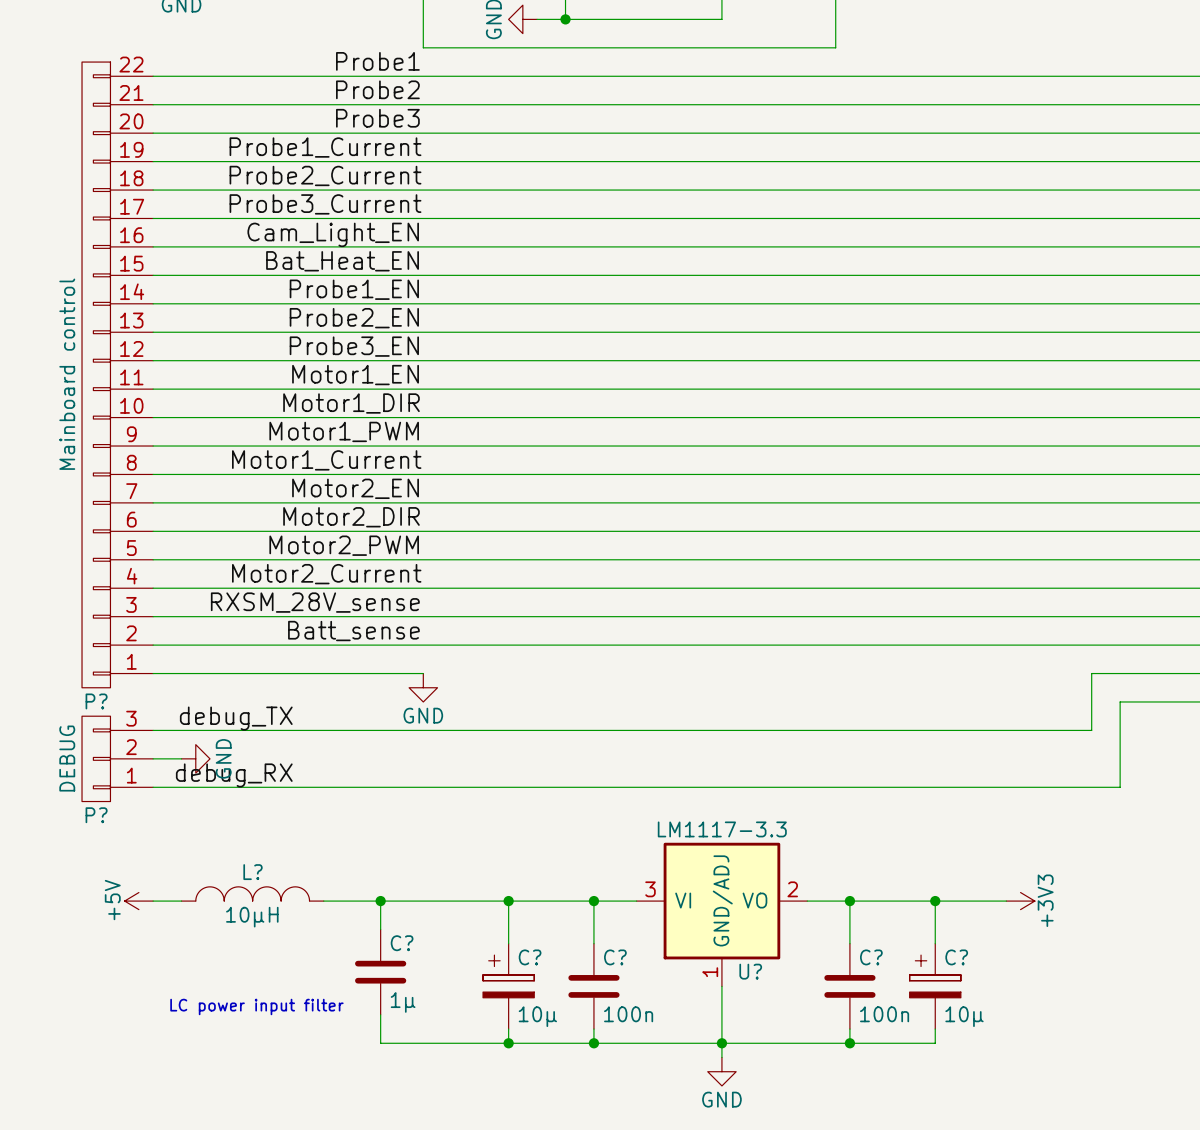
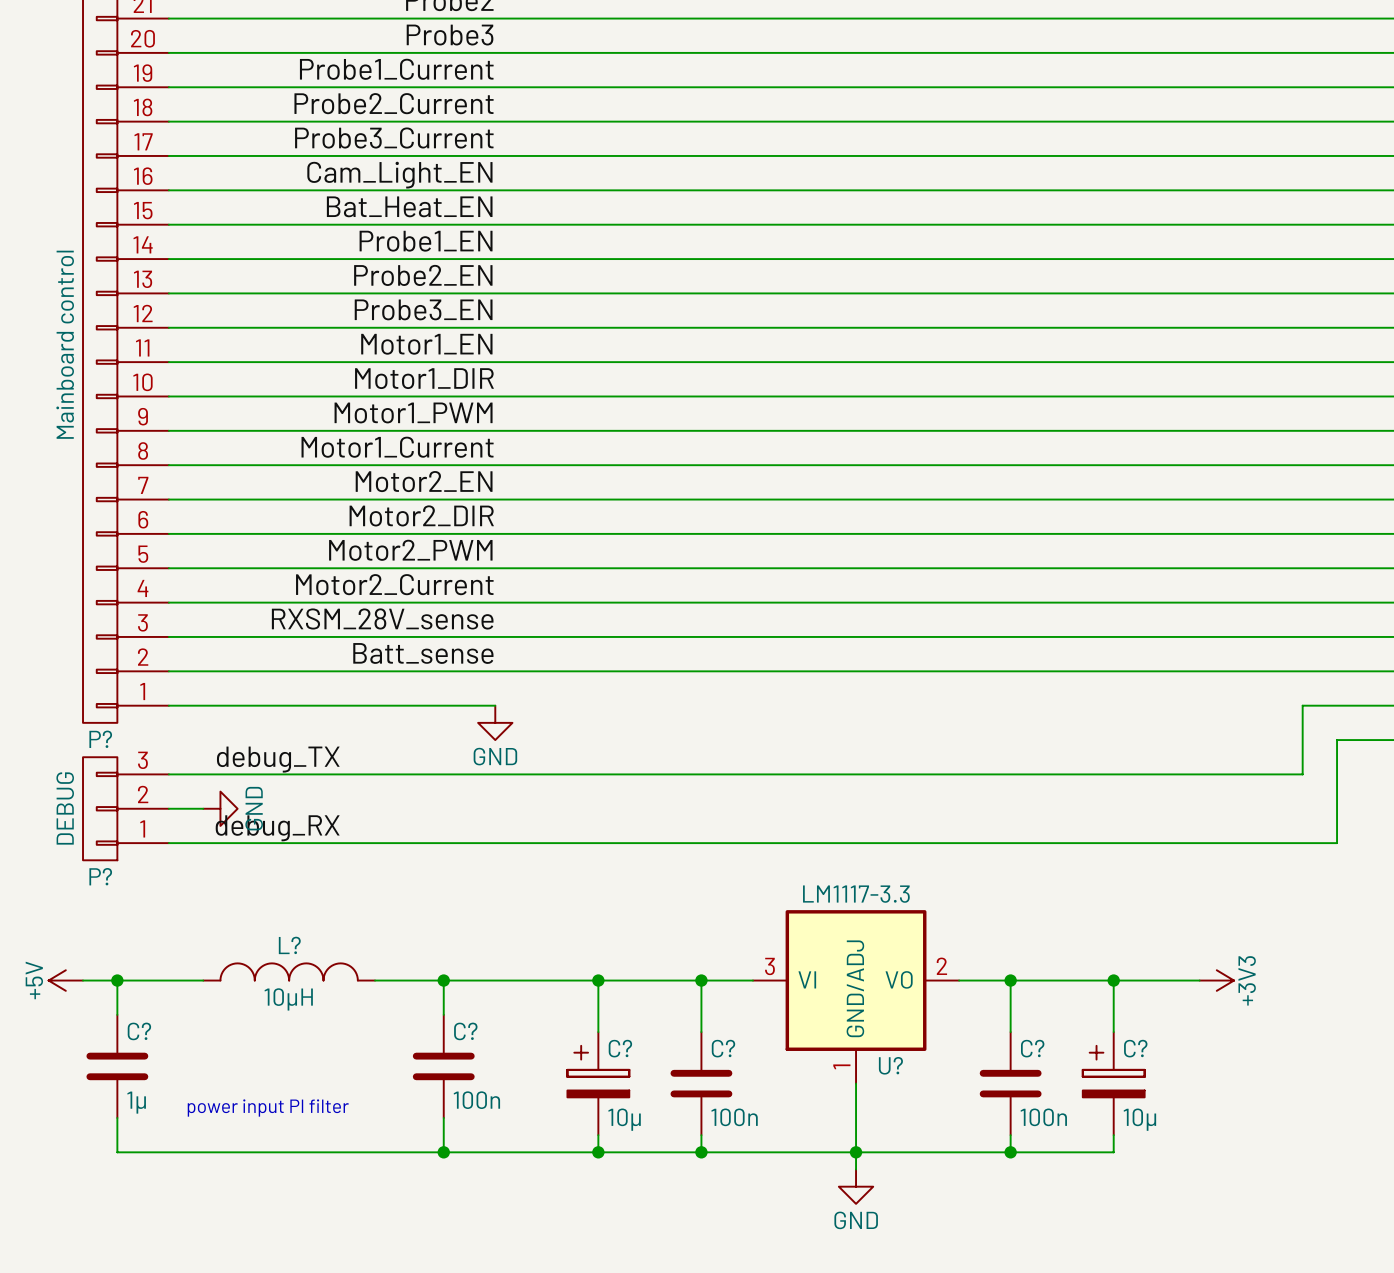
wire: none -> (83, 980) (168, 980)
wire: none -> (117, 980) (117, 1014)
junction: none -> (117, 980)
power symbol position: +5V (138, 901) -> +5V (65, 980)
C?: none -> 1µ (117, 1066)
C? value: 1µ (403, 1002) -> 100n (476, 1100)
text: LC power input filter (256, 1006) -> power input PI filter (268, 1108)
wire: none -> (117, 1117) (117, 1152) (443, 1152)
junction: none -> (443, 1152)

